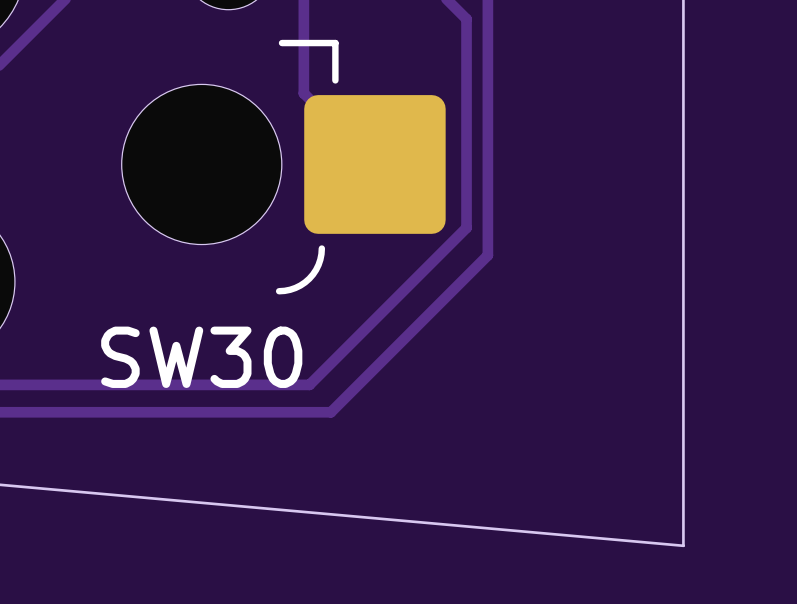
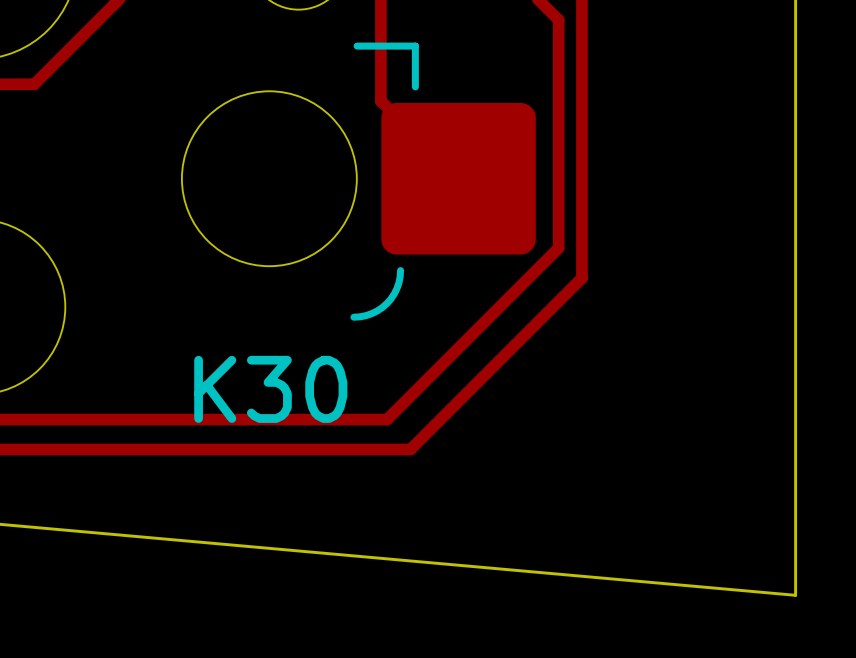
SW30 name: SW30 (201, 357) -> K30 (270, 389)

